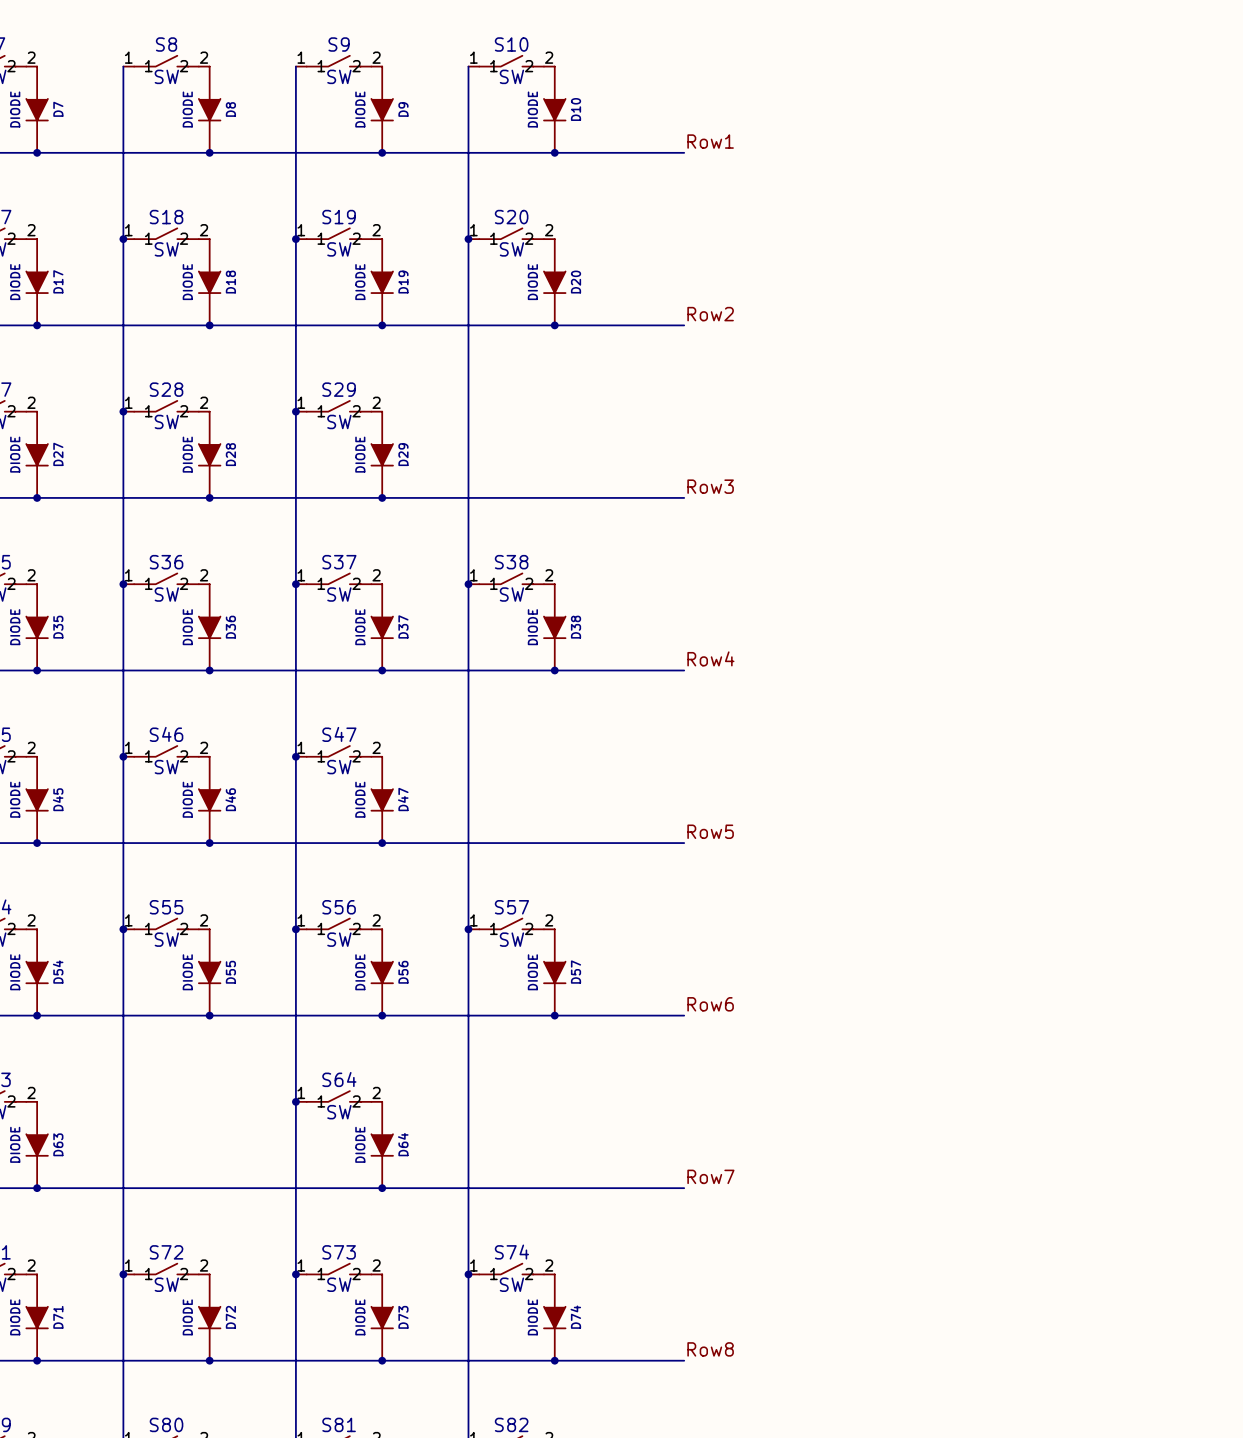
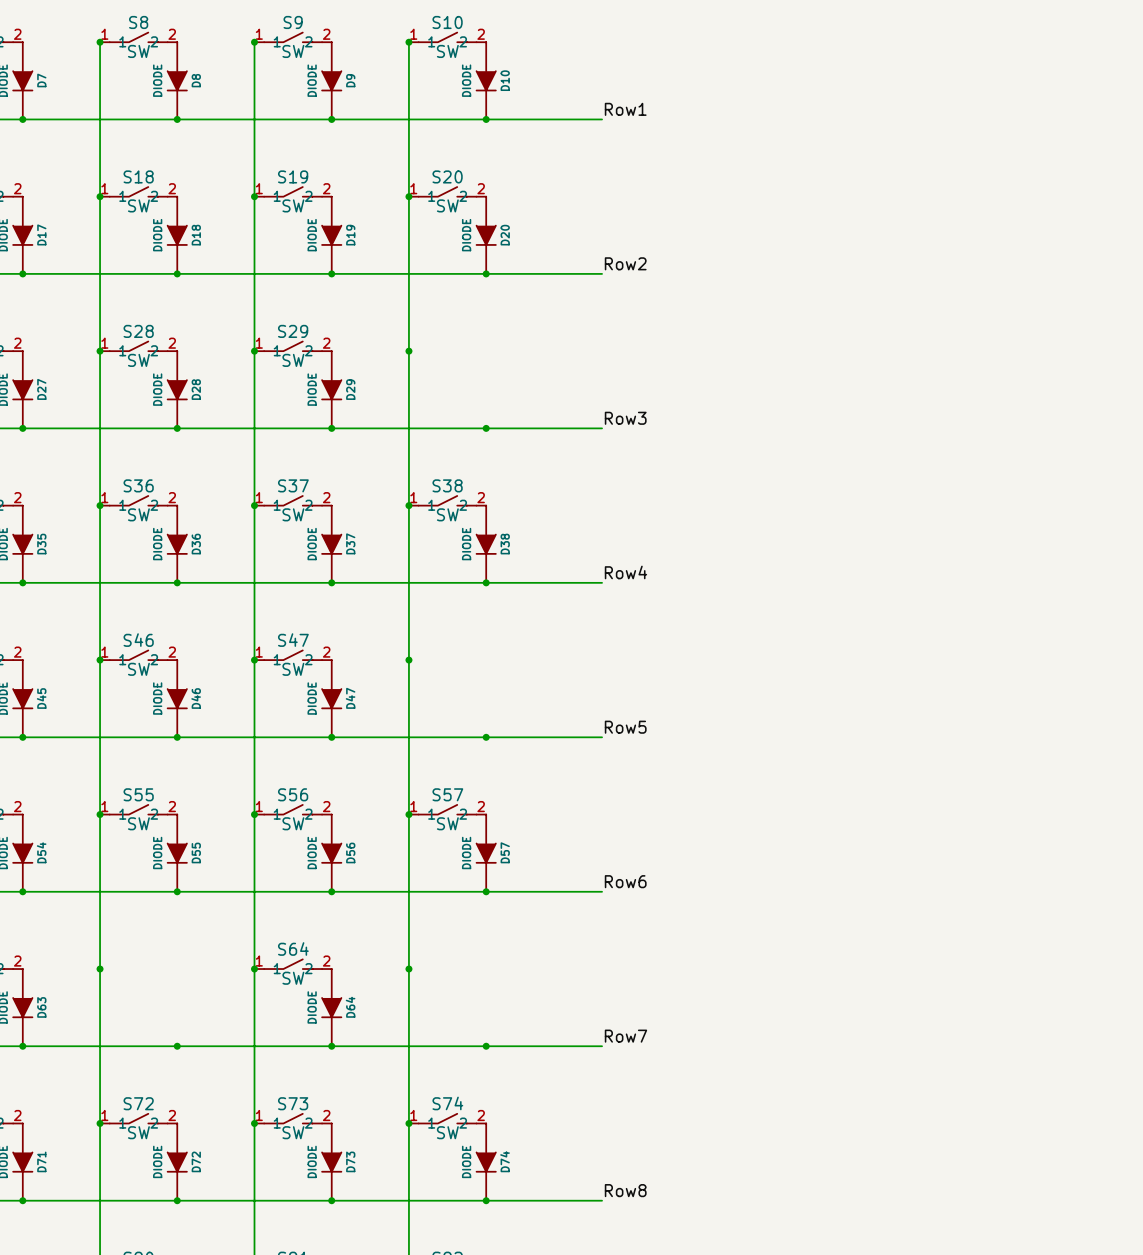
junction: none -> (100, 42)
junction: none -> (254, 42)
junction: none -> (408, 42)
junction: none -> (408, 351)
junction: none -> (486, 428)
junction: none -> (408, 660)
junction: none -> (486, 737)
junction: none -> (100, 969)
junction: none -> (408, 969)
junction: none -> (177, 1046)
junction: none -> (486, 1046)

